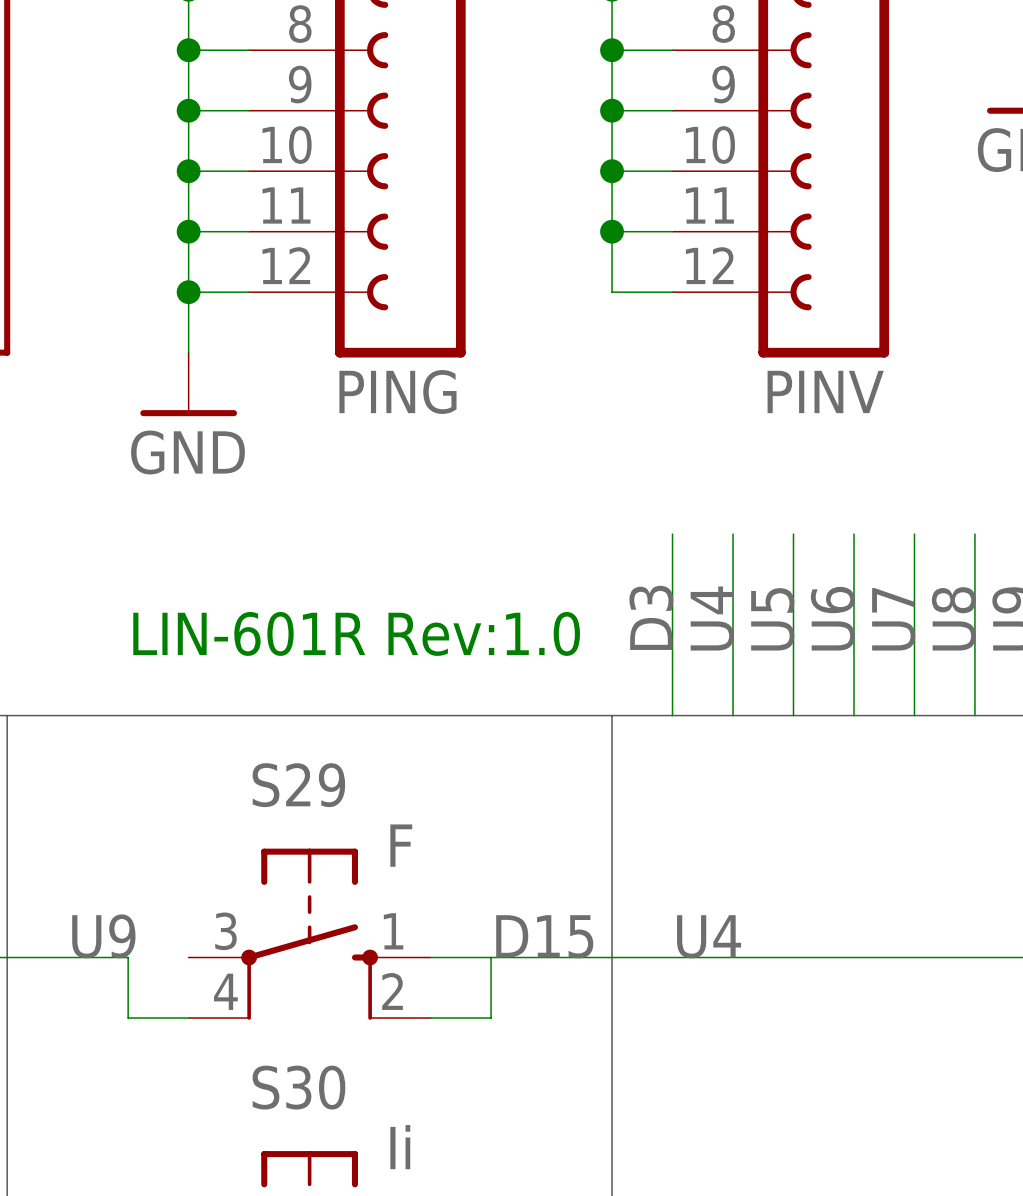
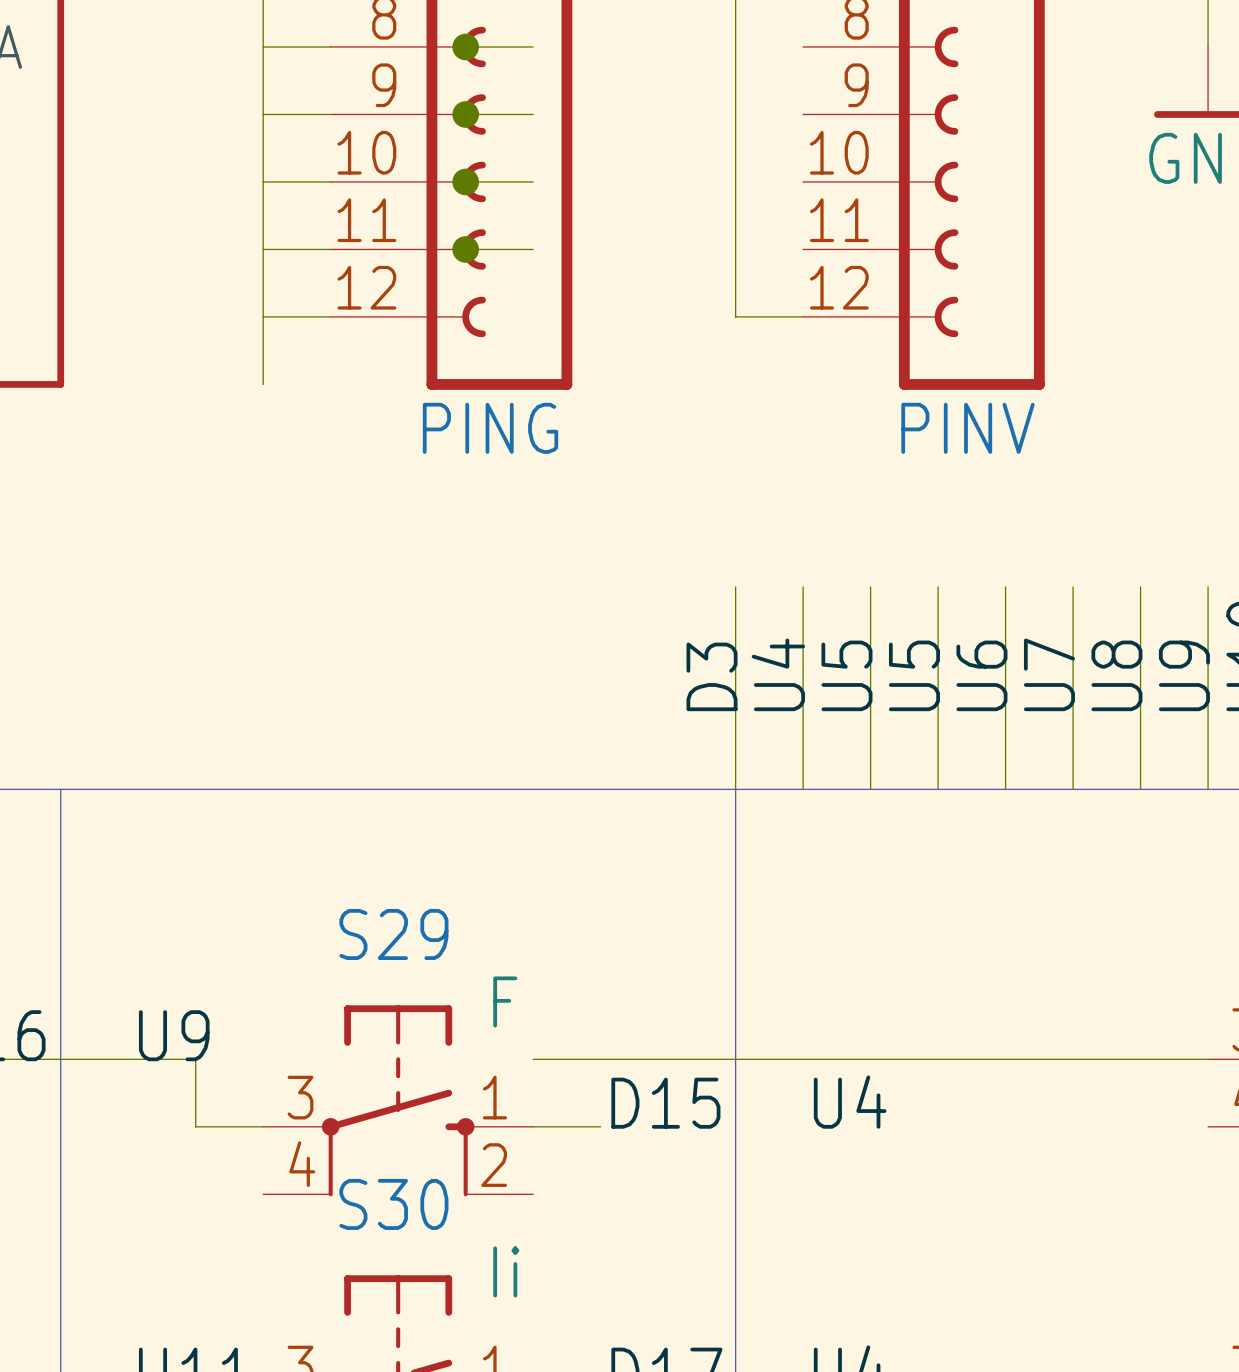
junction: (188, 50) -> none
junction: none -> (465, 46)
wire: (612, 50) (672, 50) -> (465, 46) (533, 46)
junction: (612, 50) -> none
junction: (188, 110) -> none
junction: none -> (465, 114)
wire: (612, 110) (672, 110) -> (465, 114) (533, 114)
junction: (612, 110) -> none
junction: (188, 171) -> none
junction: none -> (465, 181)
wire: (612, 171) (672, 171) -> (465, 181) (533, 181)
junction: (612, 171) -> none
junction: (188, 231) -> none
junction: none -> (465, 249)
wire: (612, 231) (672, 231) -> (465, 249) (533, 249)
junction: (612, 231) -> none
junction: (188, 292) -> none
power symbol: GND (188, 384) -> none
wire: none -> (735, 586) (735, 789)
label: none -> D3 (712, 676)
label: D3 (651, 617) -> U4 (778, 674)
label: U4 (712, 618) -> U5 (846, 675)
text: LIN-601R Rev:1.0 (356, 633) -> none
S29 position: (309, 934) -> (398, 1100)
label position: D15 (544, 936) -> D15 (665, 1103)
label position: U4 (709, 936) -> U4 (850, 1102)
wire: (491, 957) (491, 1018) -> none

